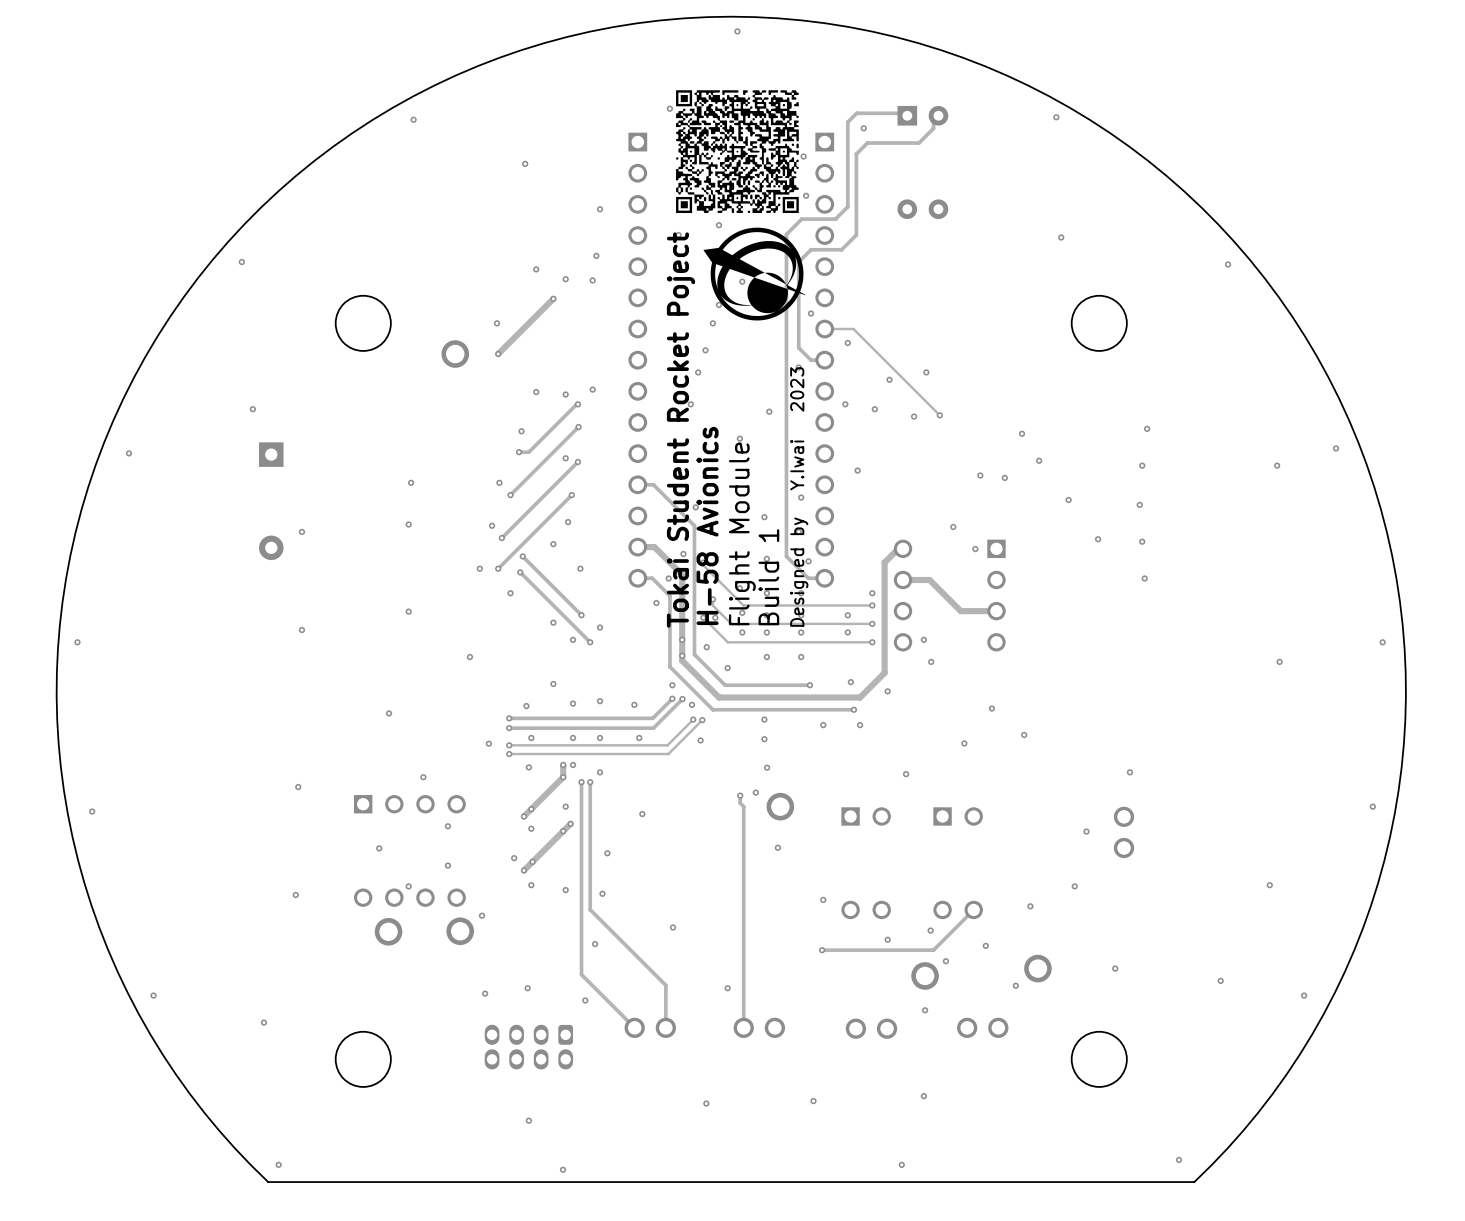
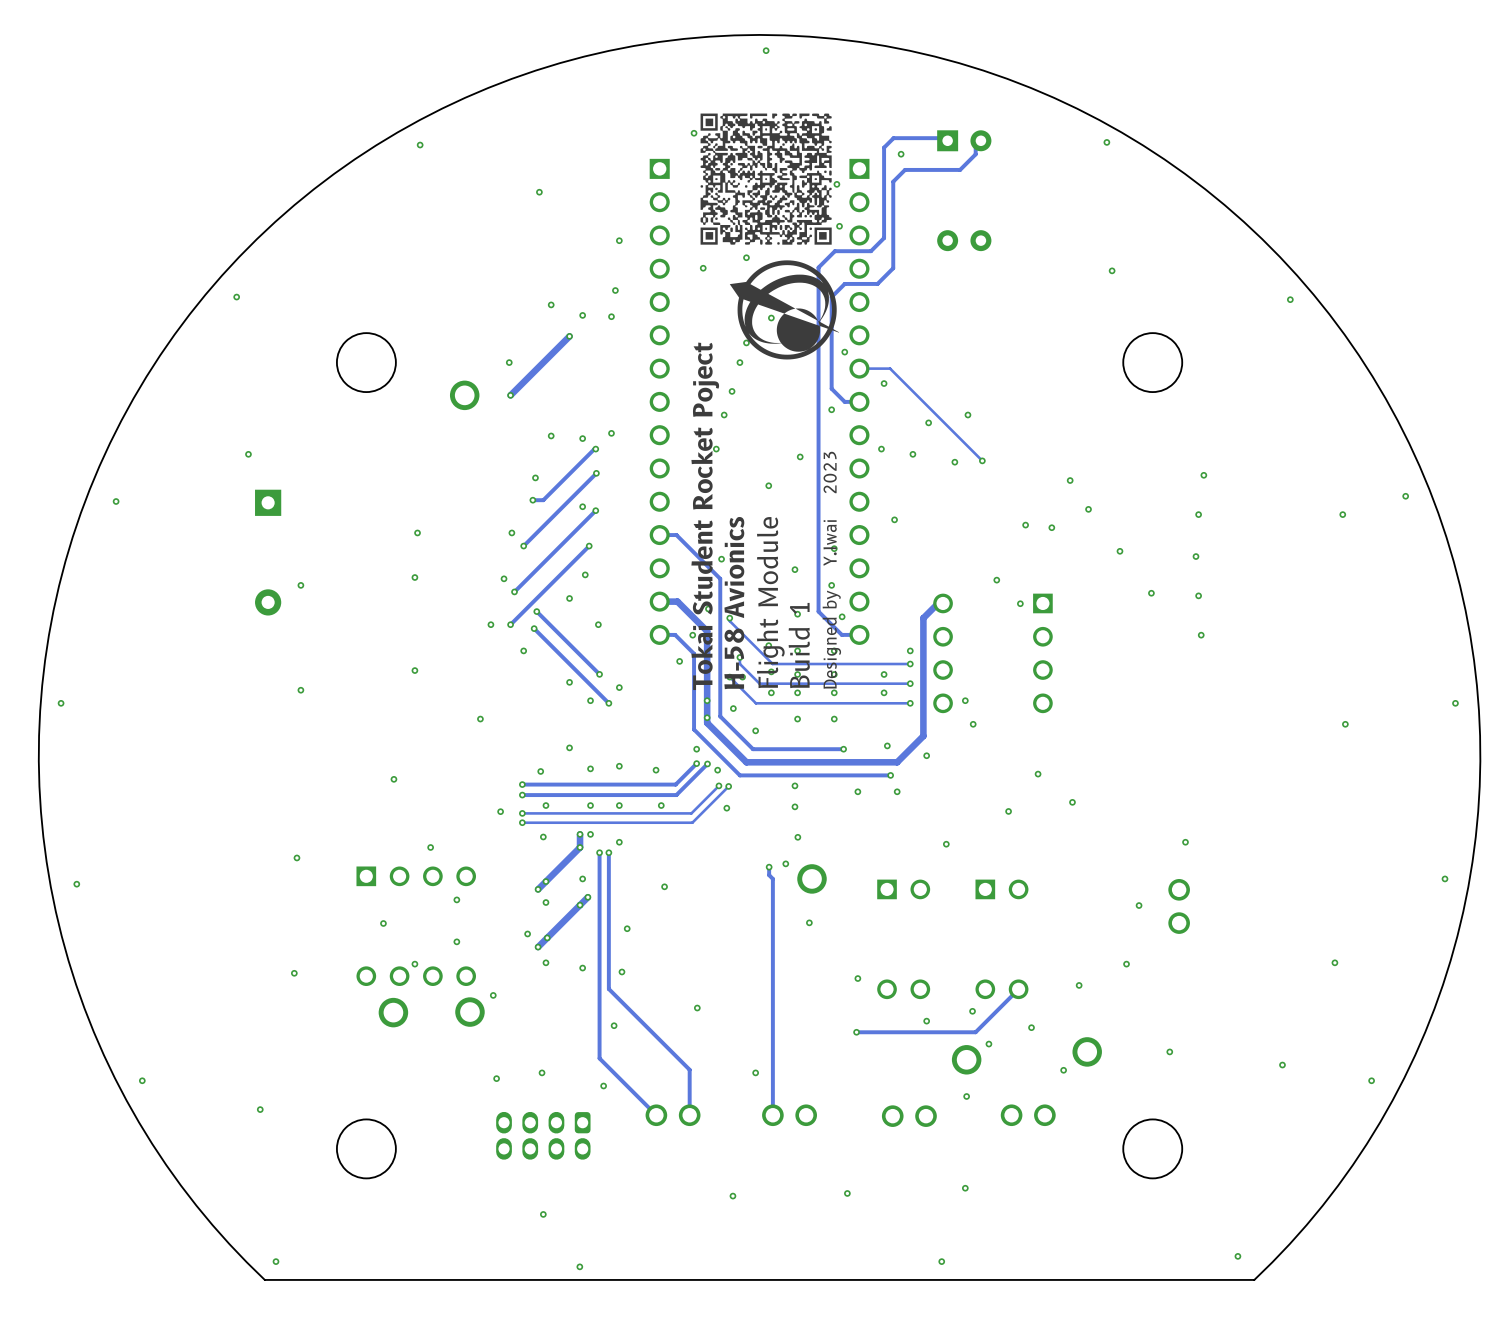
track: (903, 579) (929, 579) (960, 611) (996, 611) -> none

